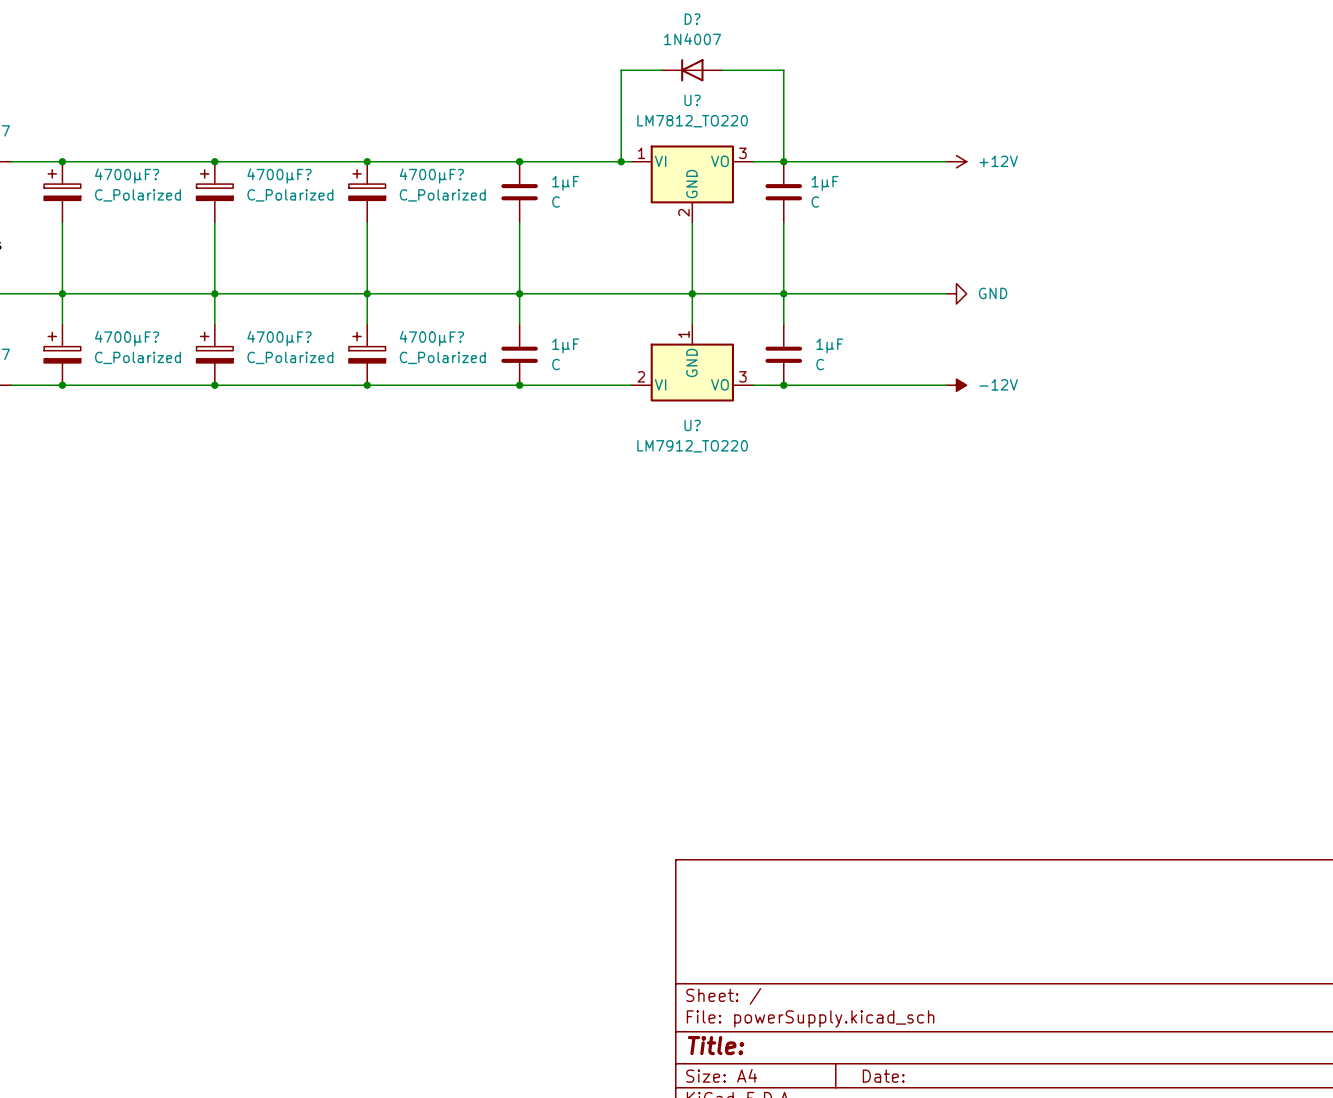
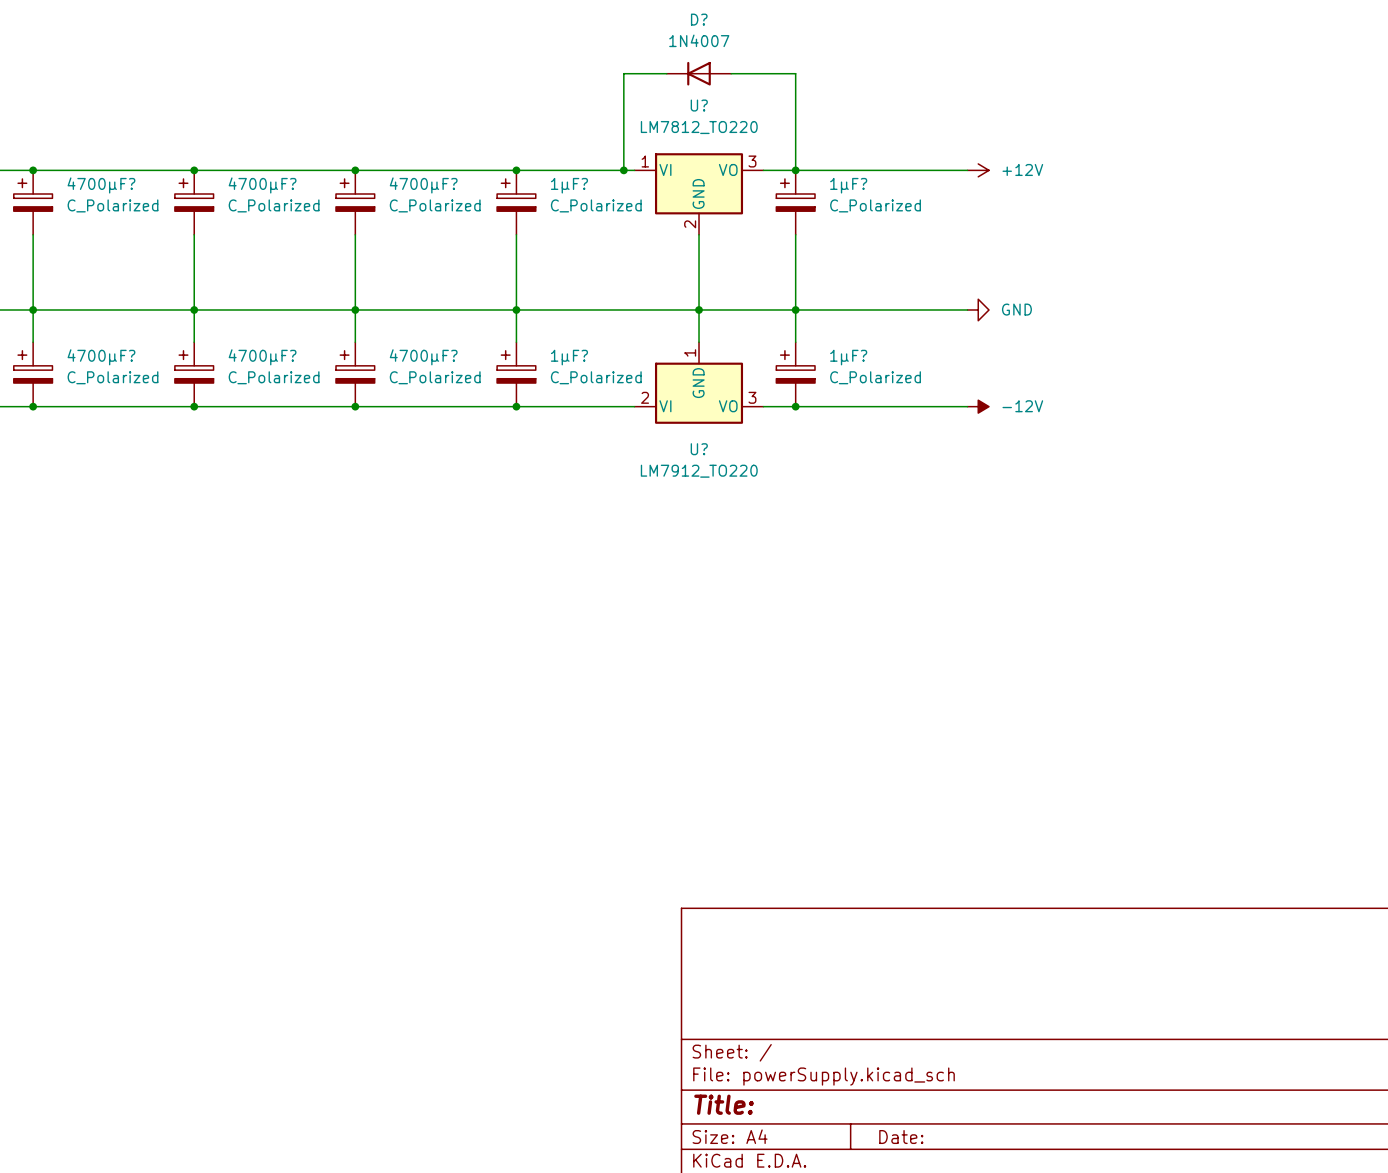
1µF: C (519, 192) -> none
1µF?: none -> C_Polarized (516, 202)
1µF: C (783, 192) -> none
1µF?: none -> C_Polarized (795, 202)
1µF: C (519, 354) -> none
1µF?: none -> C_Polarized (516, 374)
1µF: C (783, 354) -> none
1µF?: none -> C_Polarized (795, 374)

